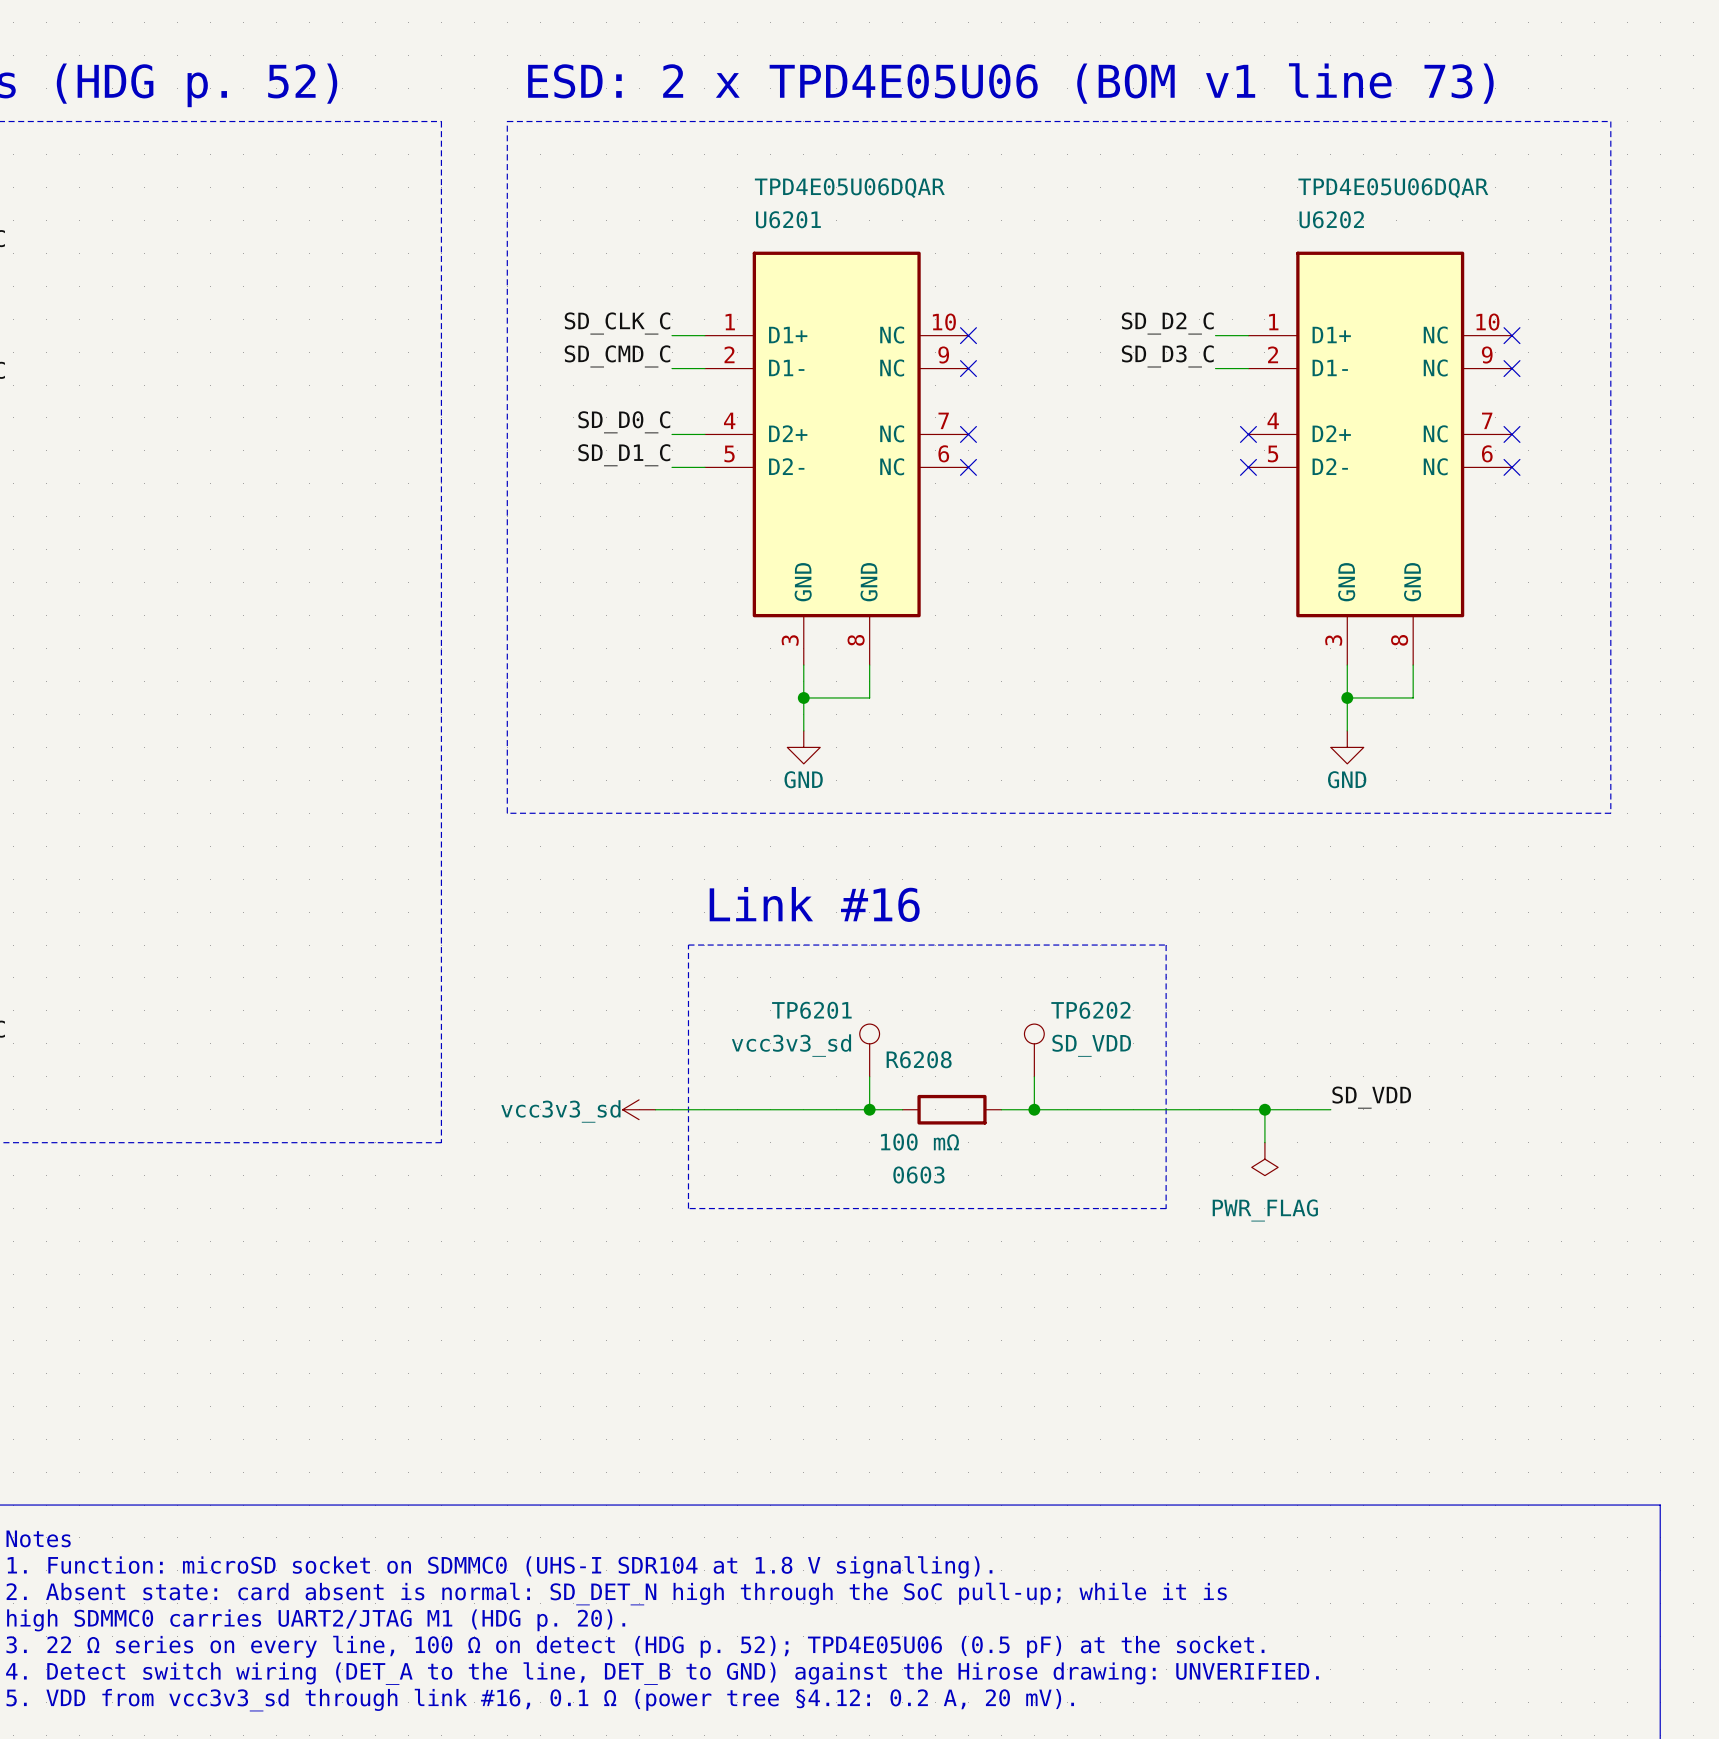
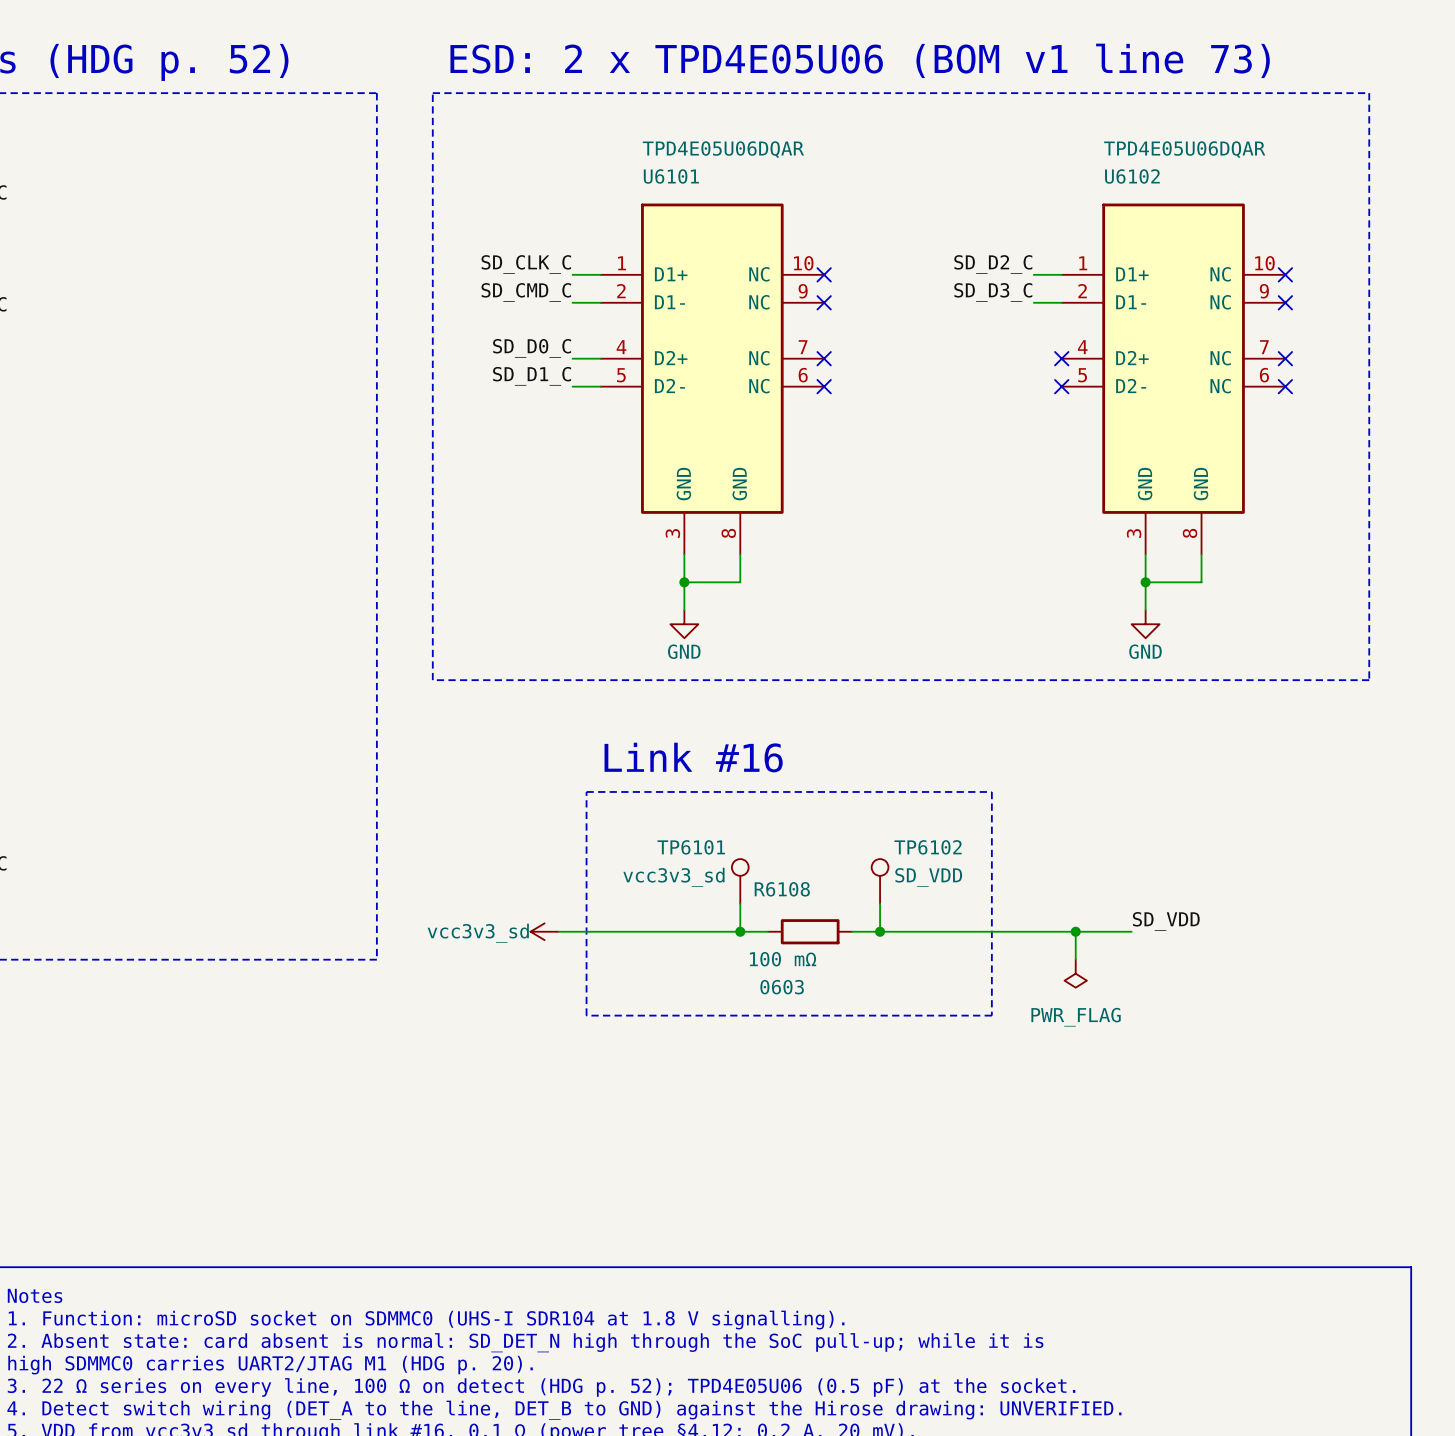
U6201 name: U6201 (788, 219) -> U6101 (671, 176)
U6202 name: U6202 (1331, 219) -> U6102 (1132, 176)
TP6201 name: TP6201 (811, 1010) -> TP6101 (691, 847)
TP6202 name: TP6202 (1090, 1010) -> TP6102 (928, 847)
R6208 name: R6208 (919, 1059) -> R6108 (782, 889)

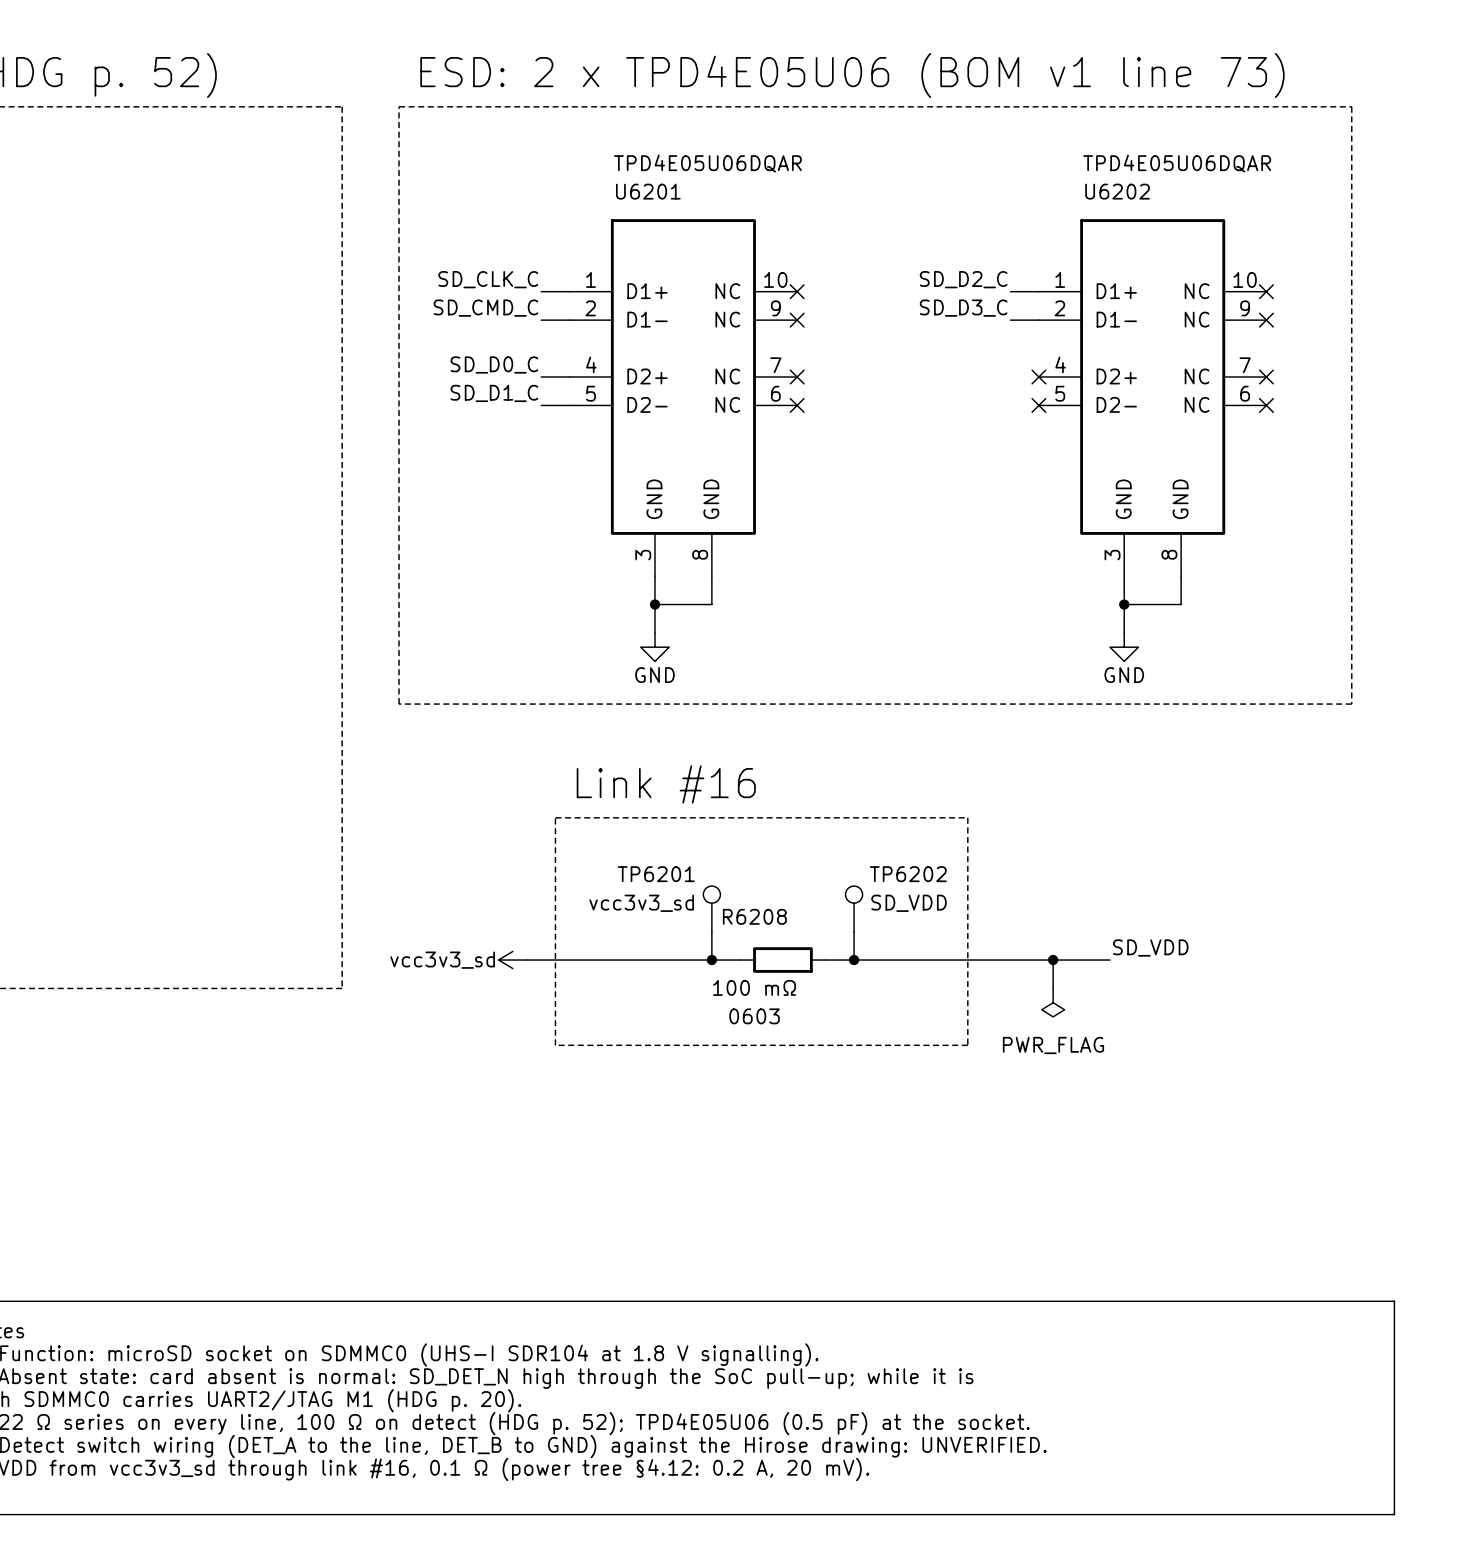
U6101 name: U6101 (671, 176) -> U6201 (648, 191)
U6102 name: U6102 (1132, 176) -> U6202 (1117, 191)
TP6101 name: TP6101 (691, 847) -> TP6201 (656, 874)
TP6102 name: TP6102 (928, 847) -> TP6202 (908, 874)
R6108 name: R6108 (782, 889) -> R6208 (754, 916)

